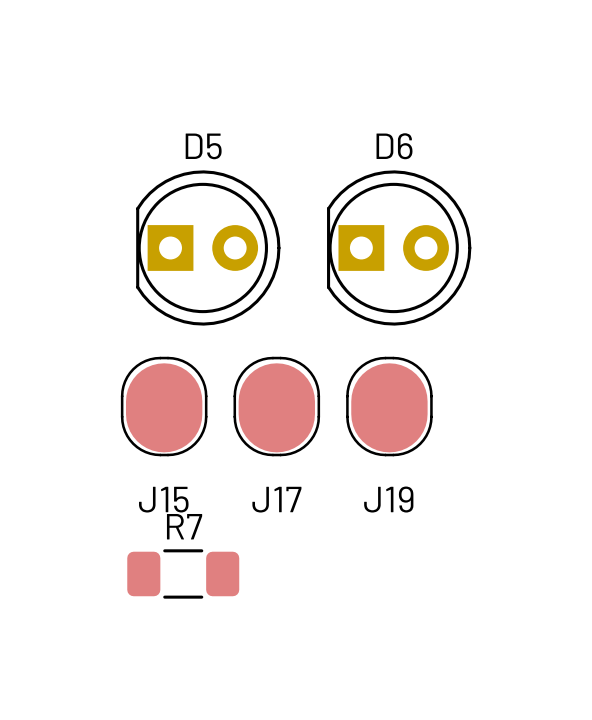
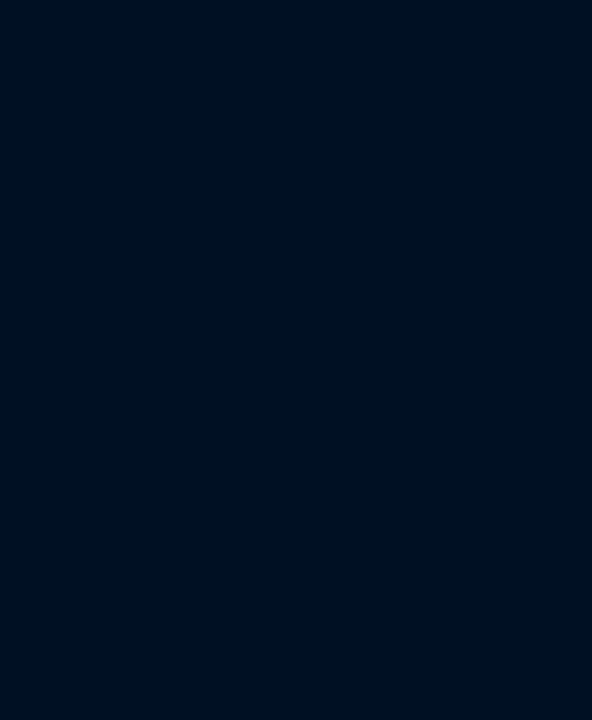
D5: (208, 247) -> none
D6: (399, 247) -> none
J15: (164, 406) -> none
J17: (276, 406) -> none
J19: (389, 406) -> none
R7: (183, 573) -> none

